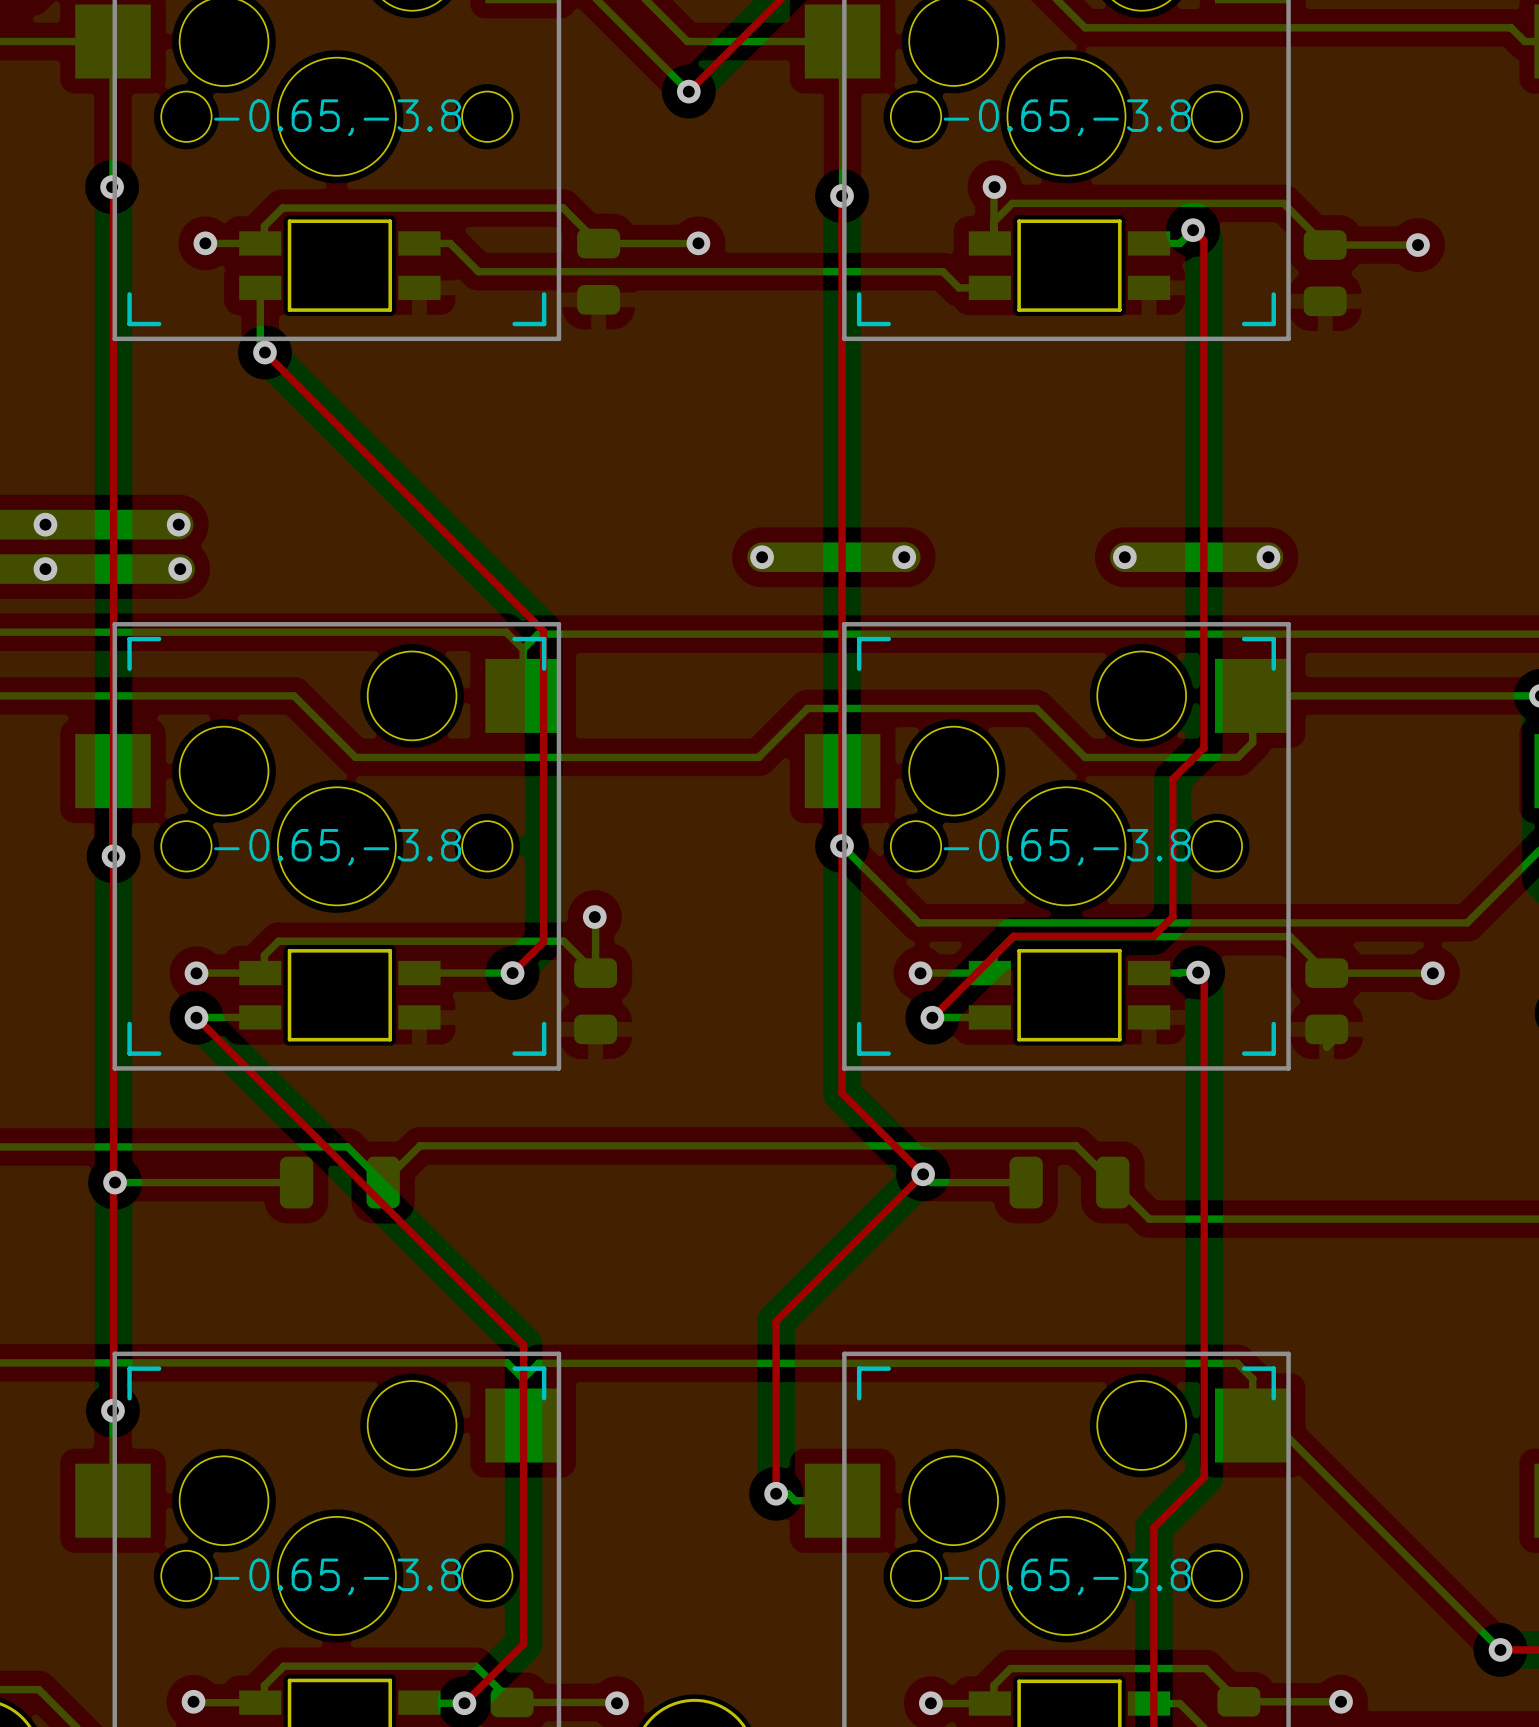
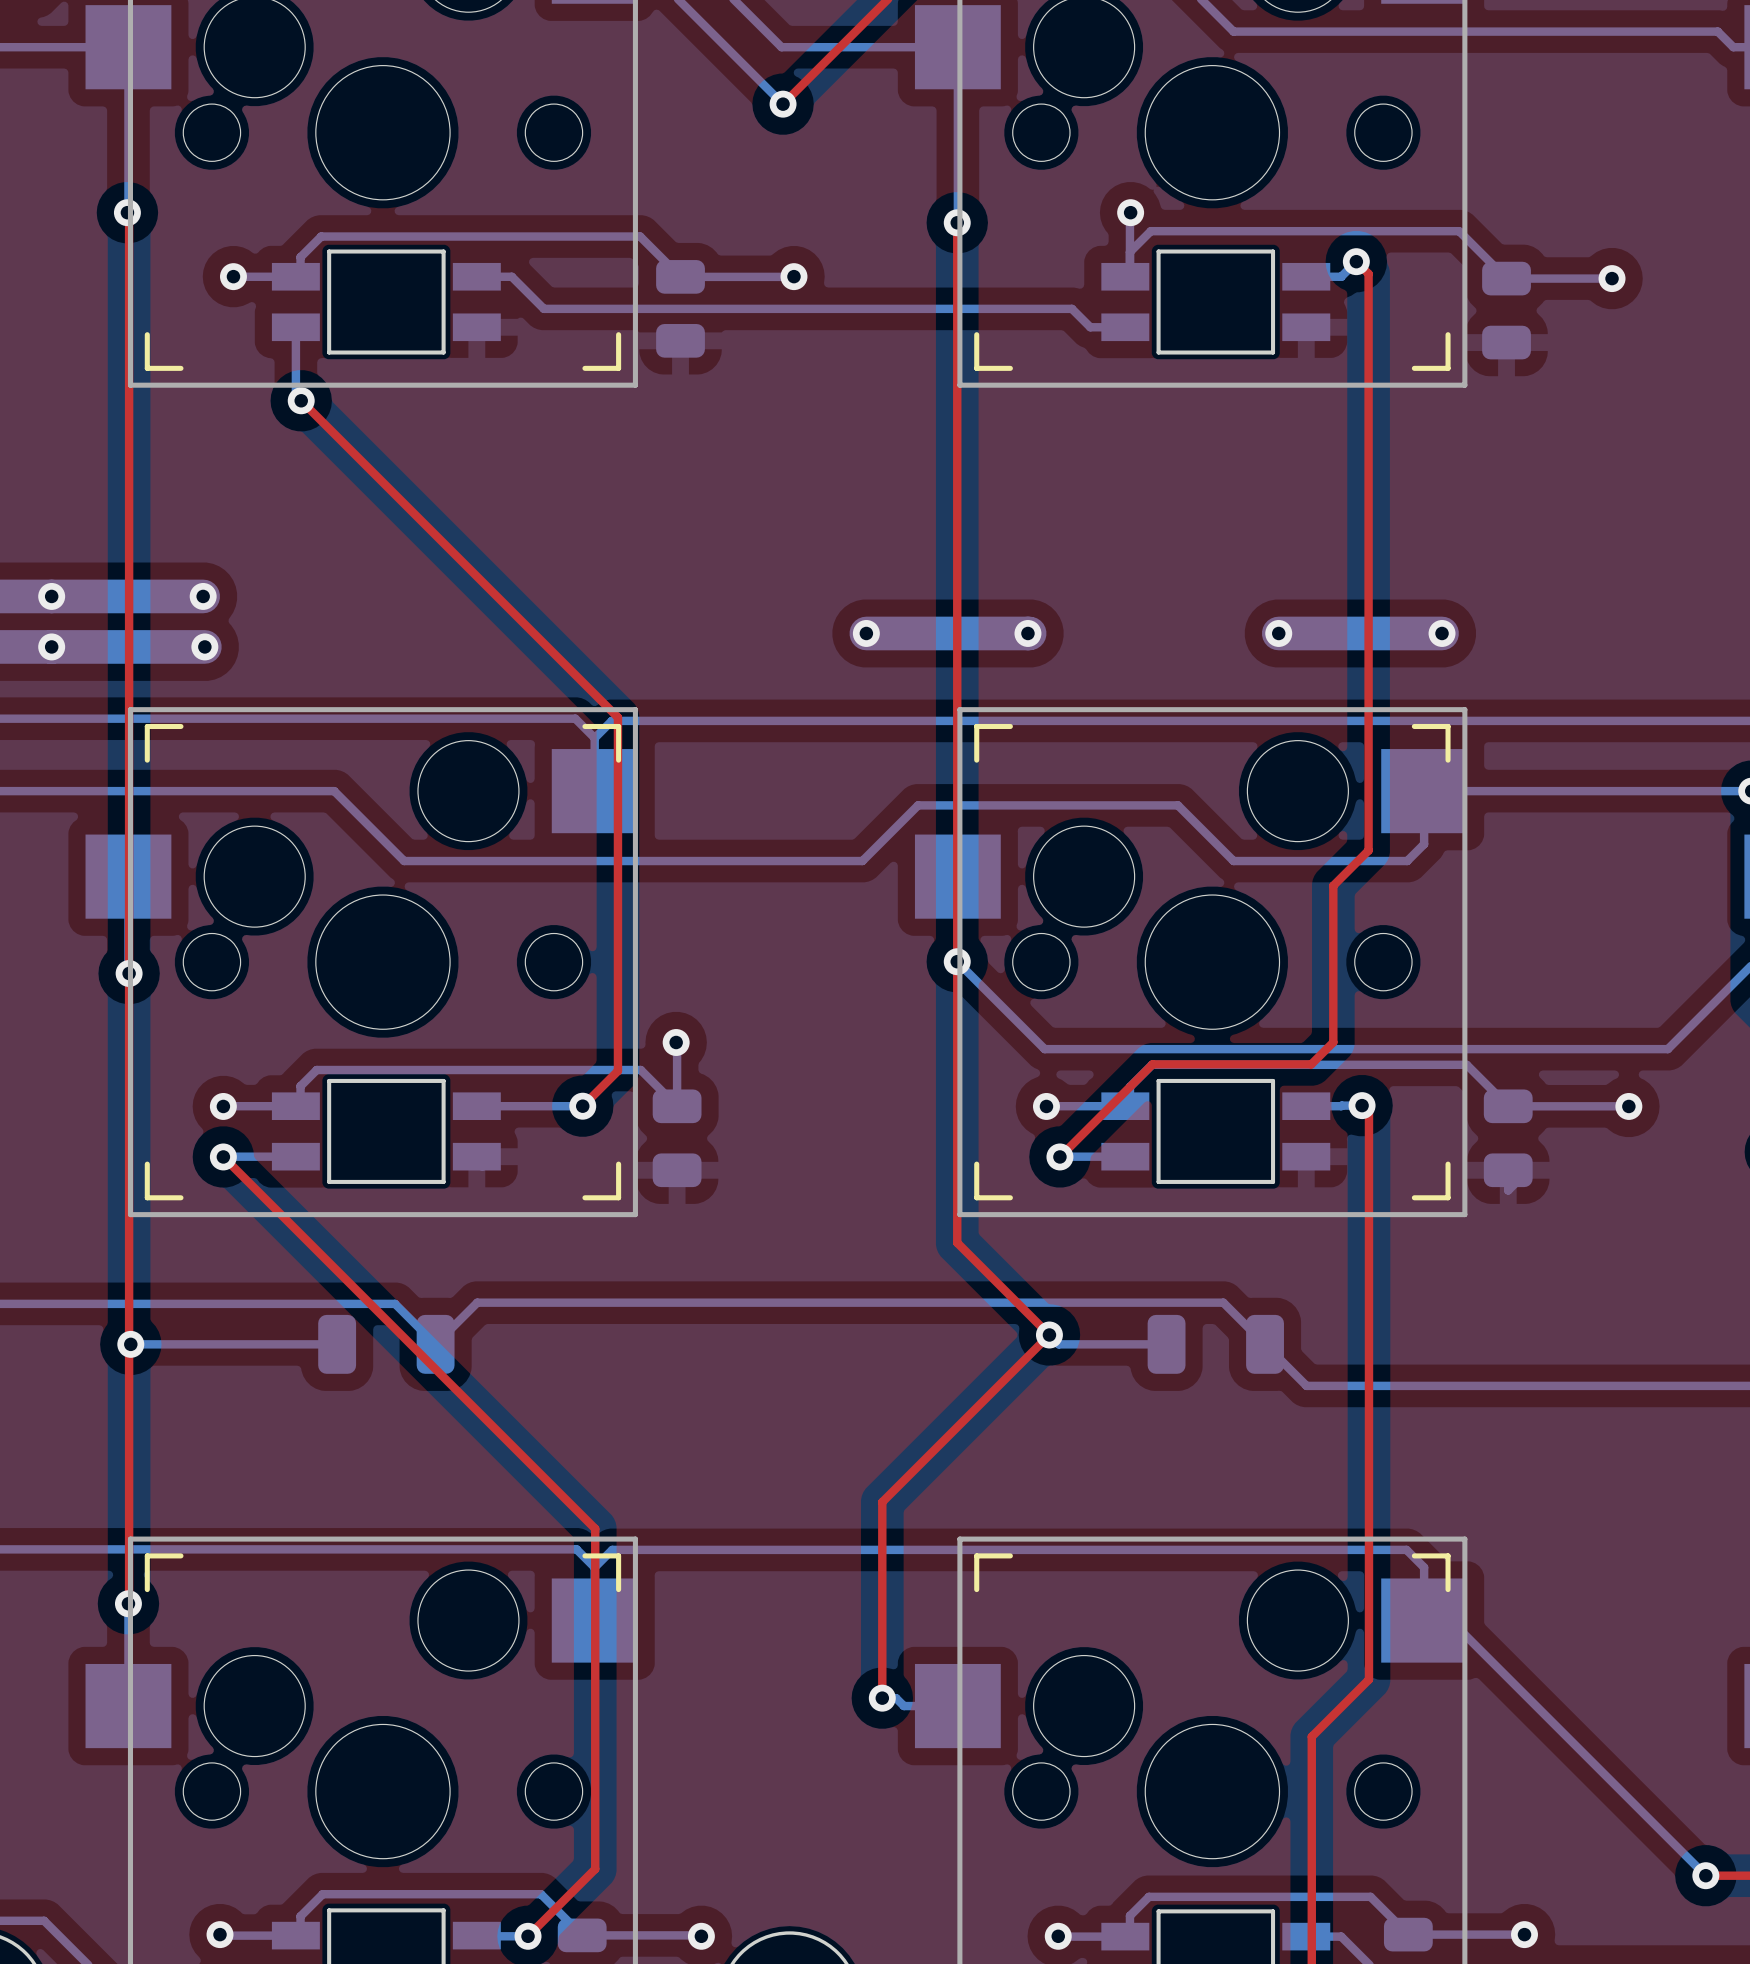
part text: -0.65,-3.8 (337, 117) -> none
part text: -0.65,-3.8 (1067, 117) -> none
part text: -0.65,-3.8 (337, 847) -> none
part text: -0.65,-3.8 (1067, 847) -> none
part text: -0.65,-3.8 (337, 1576) -> none
part text: -0.65,-3.8 (1067, 1576) -> none

